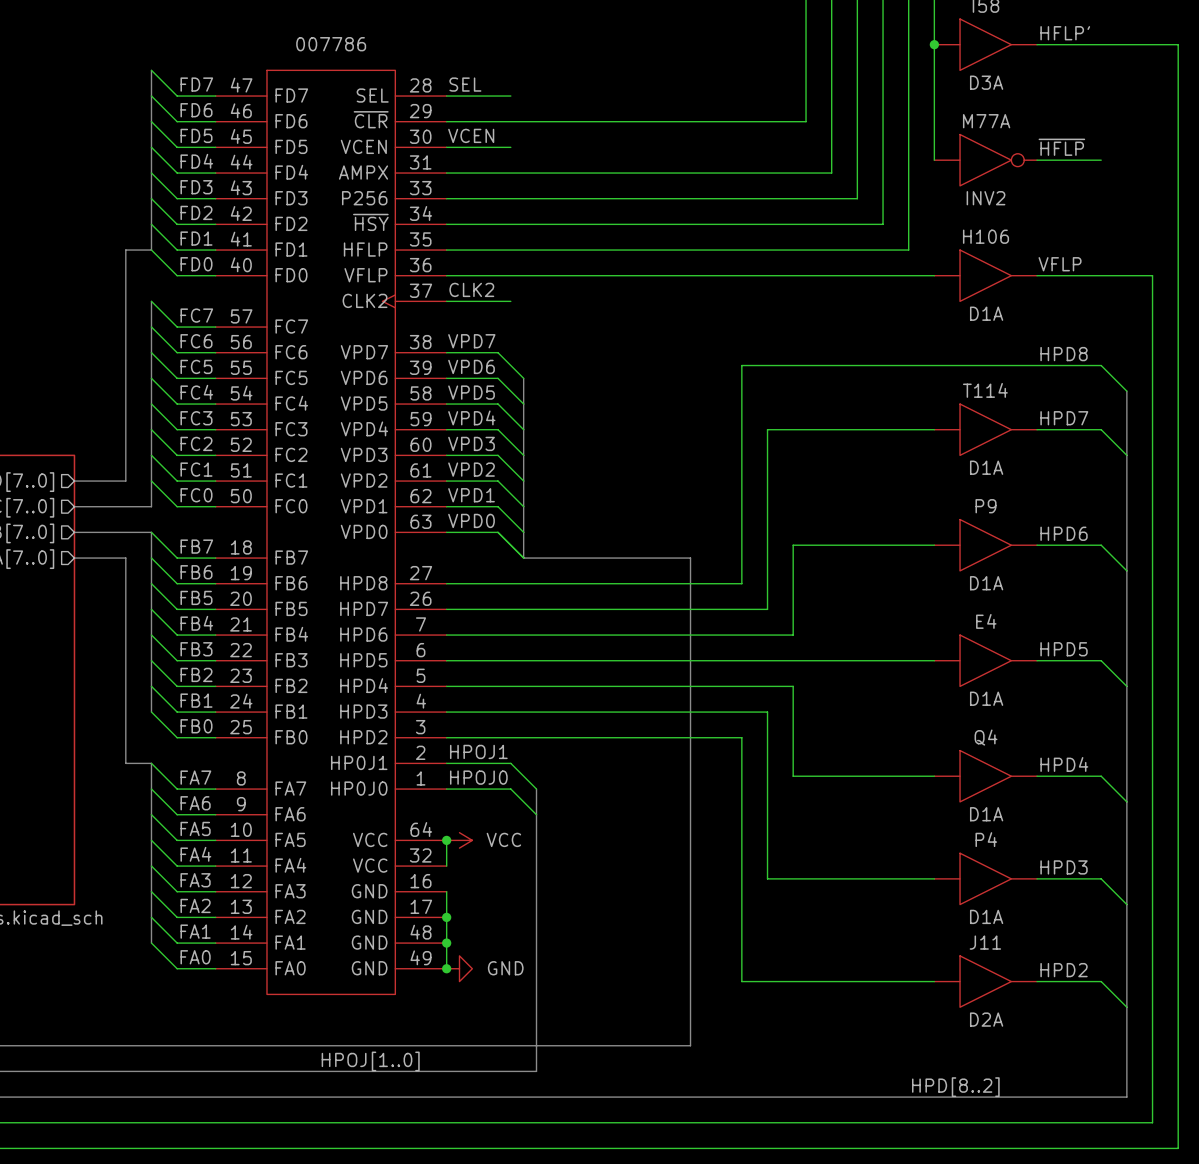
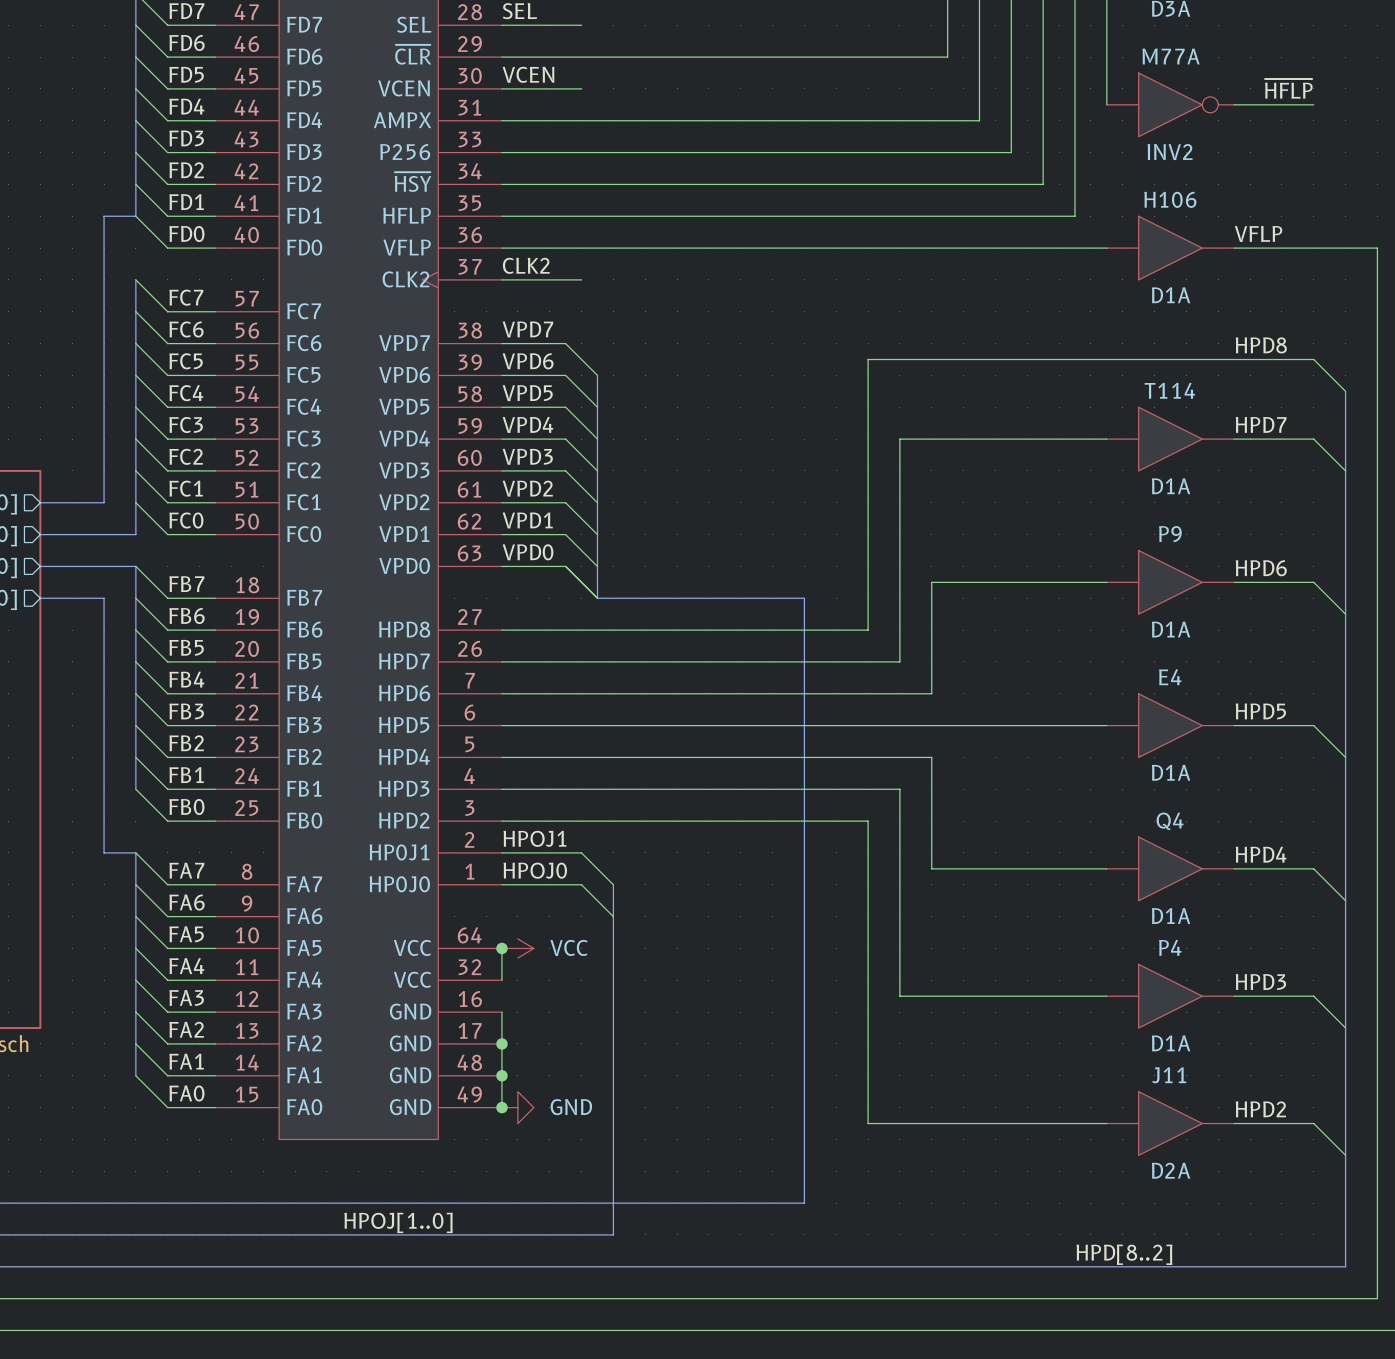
label position: ~{HFLP} (1061, 147) -> ~{HFLP} (1288, 88)

